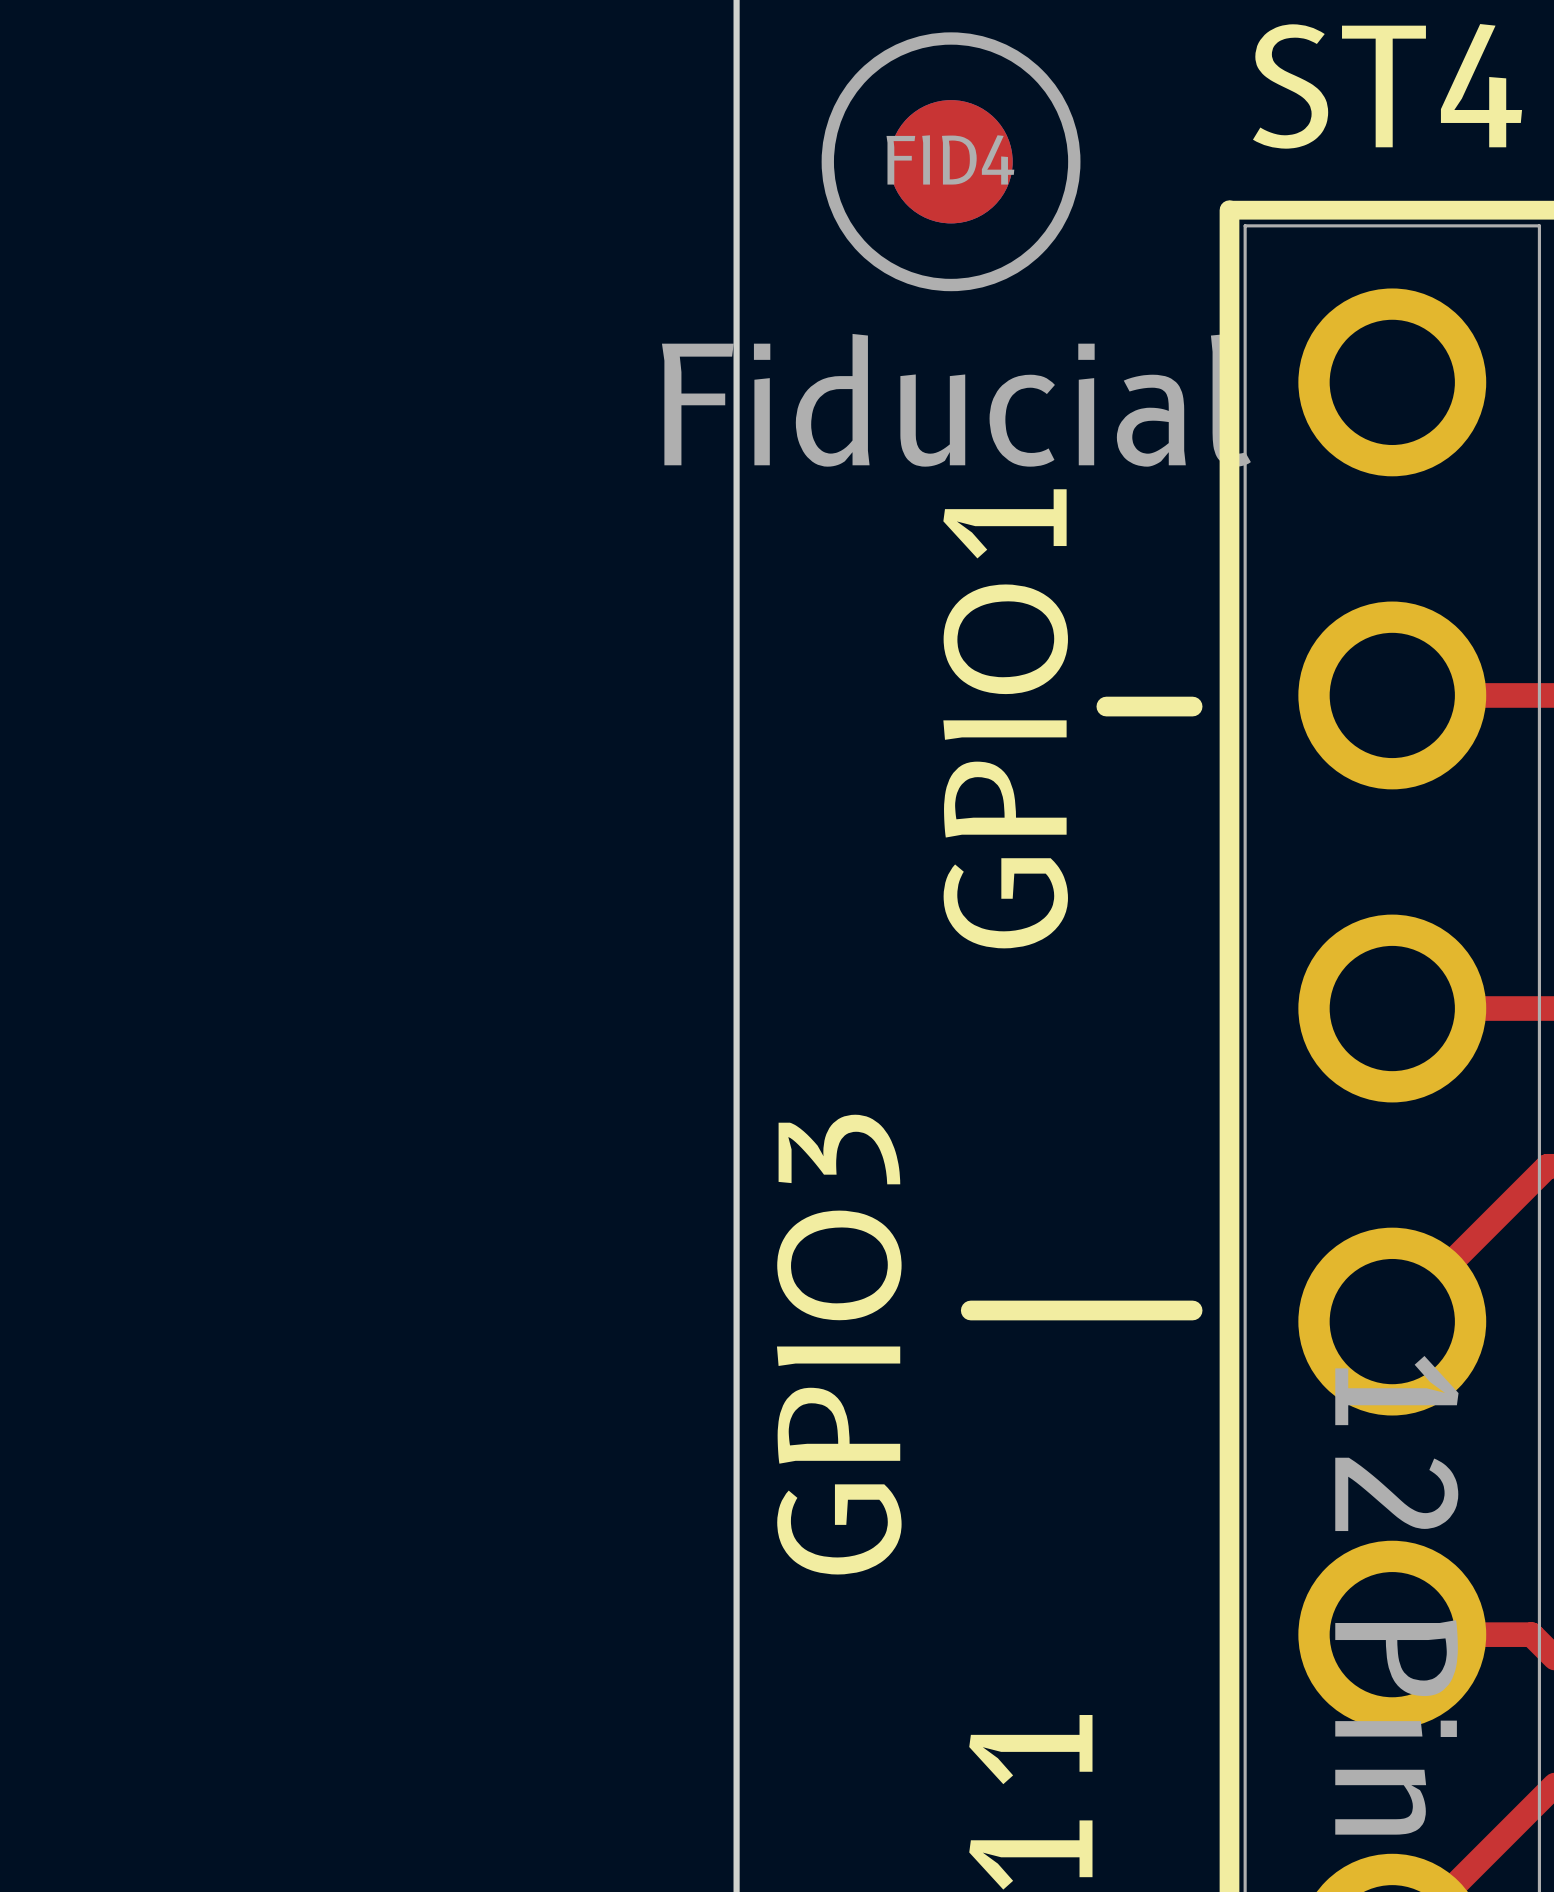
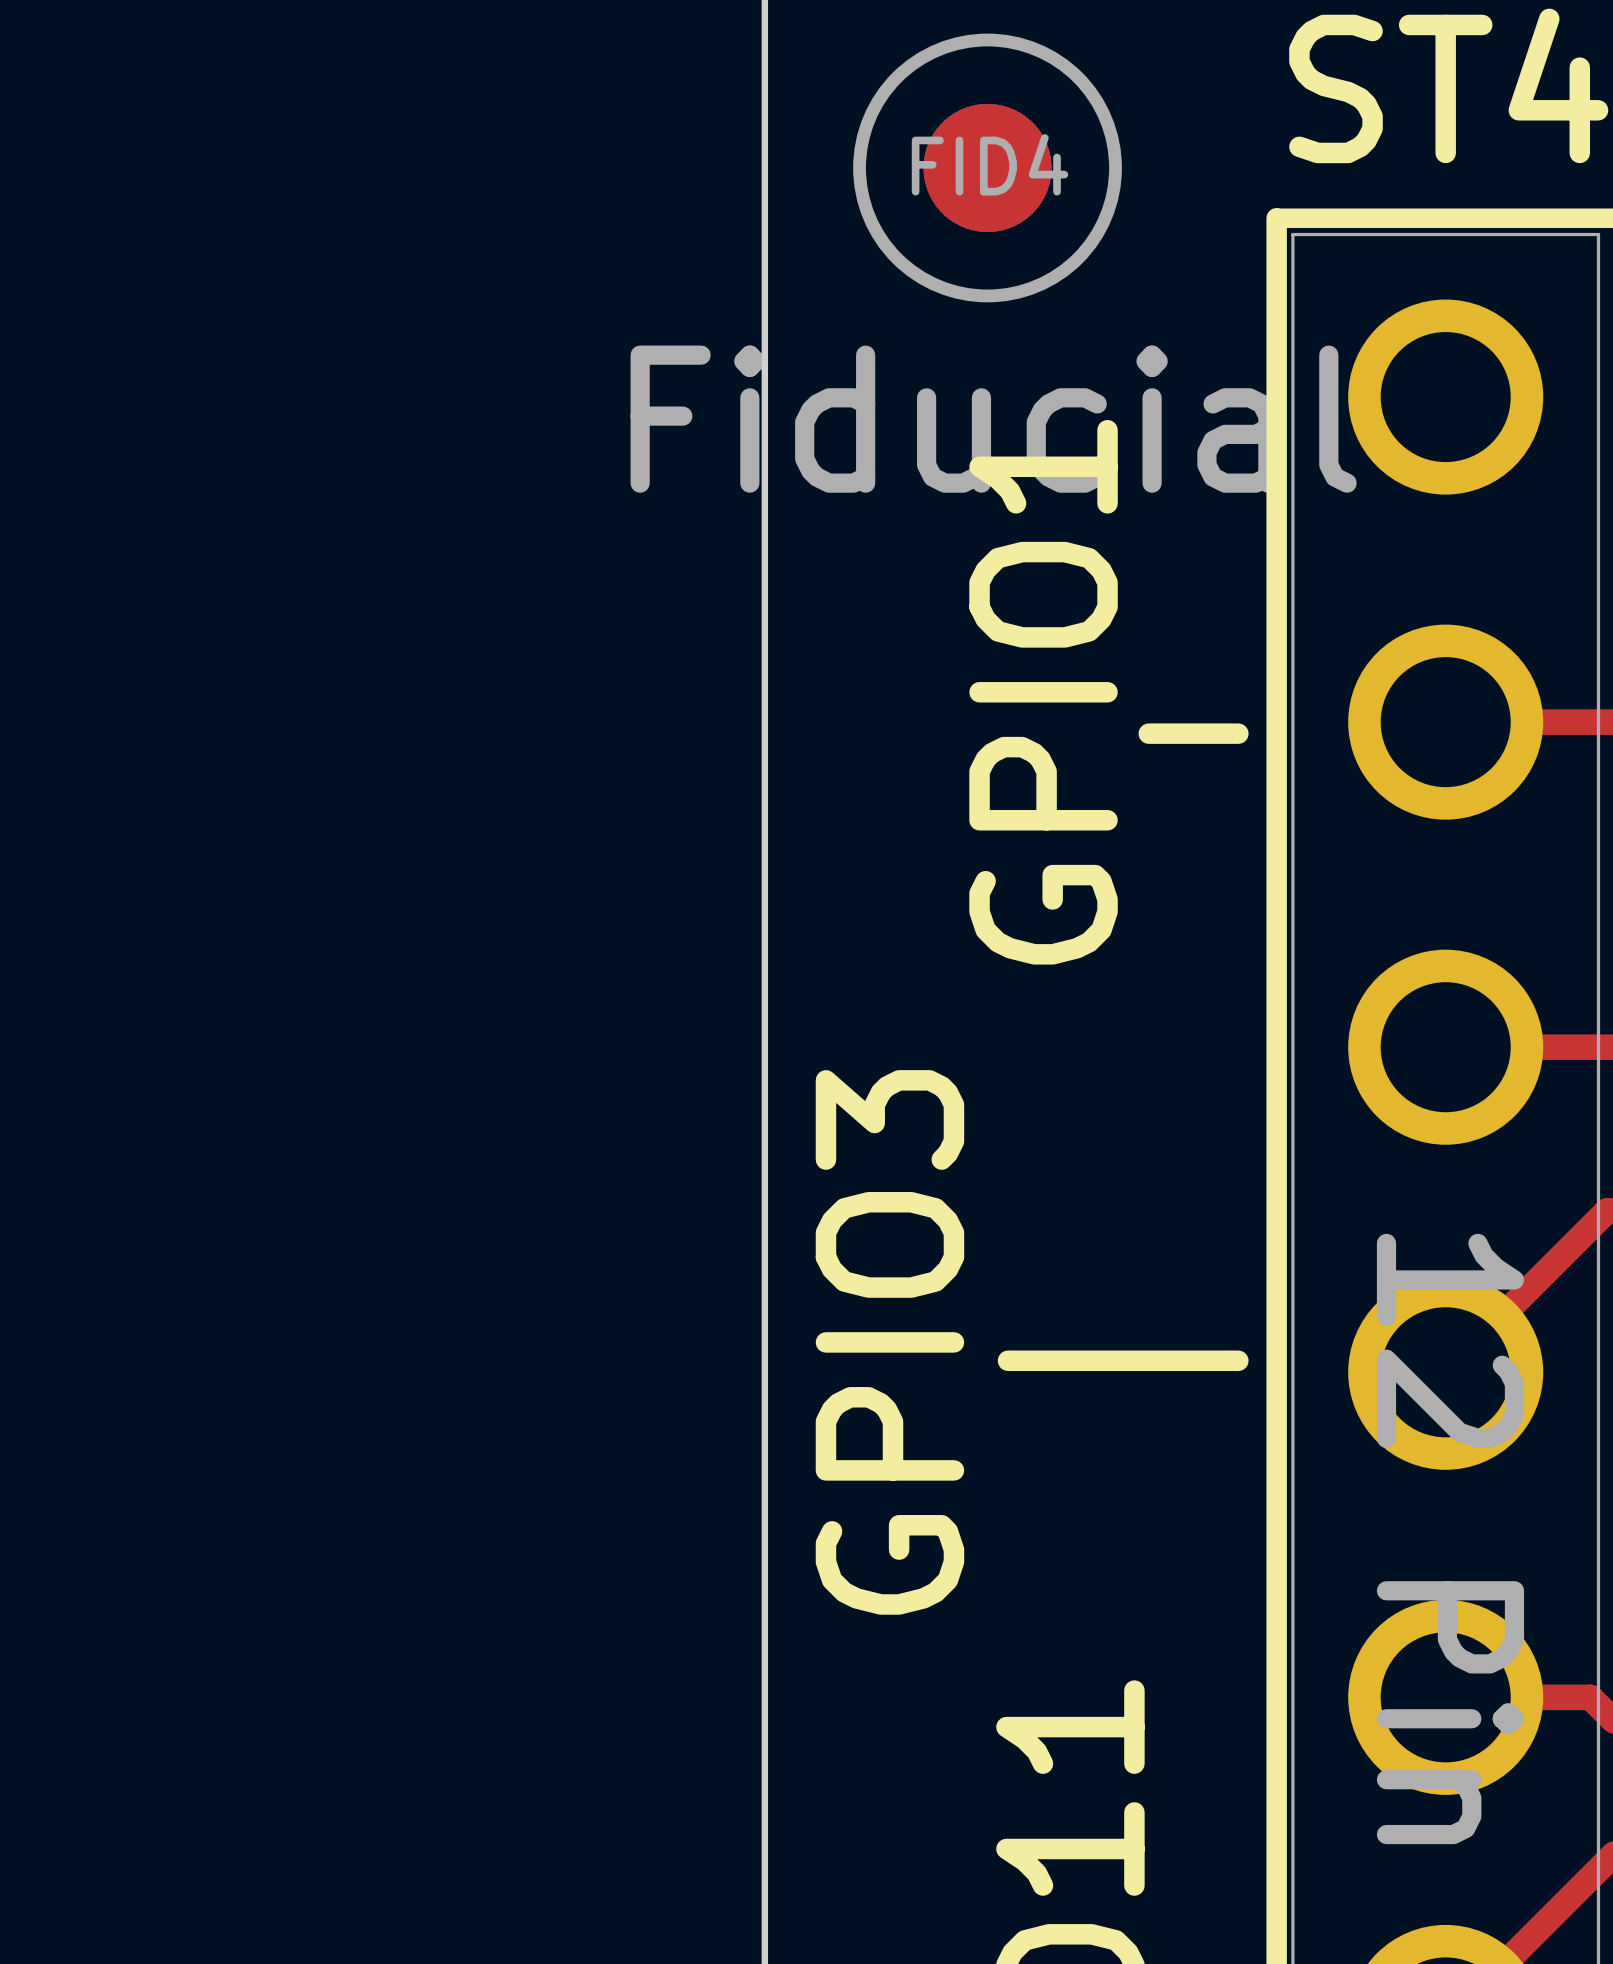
text position: GPIO3 (839, 1344) -> GPIO3 (889, 1342)

